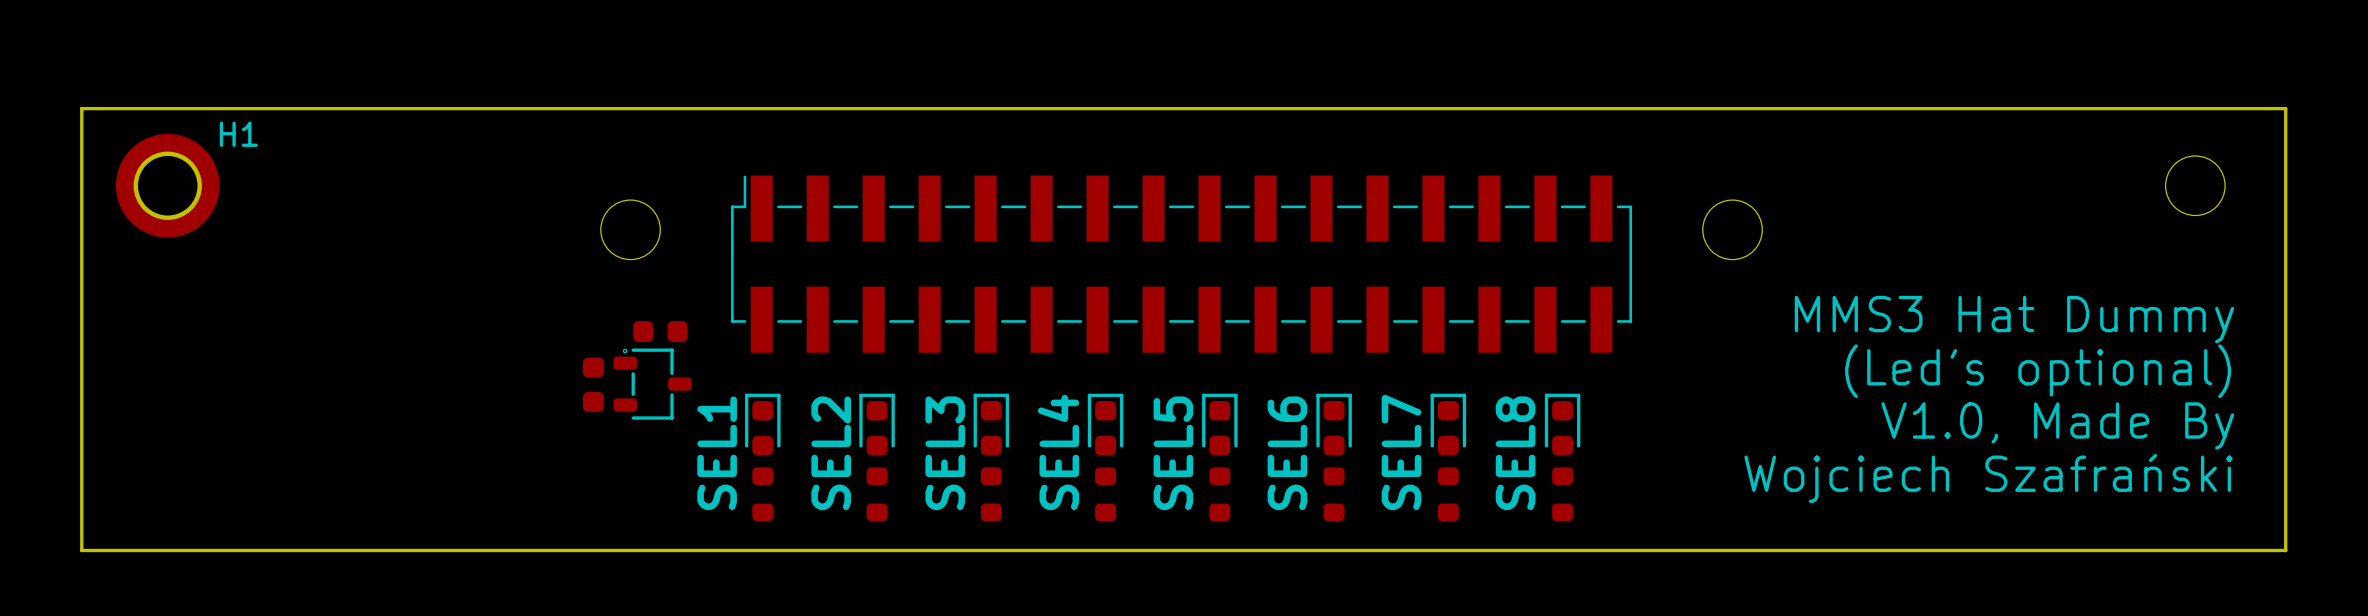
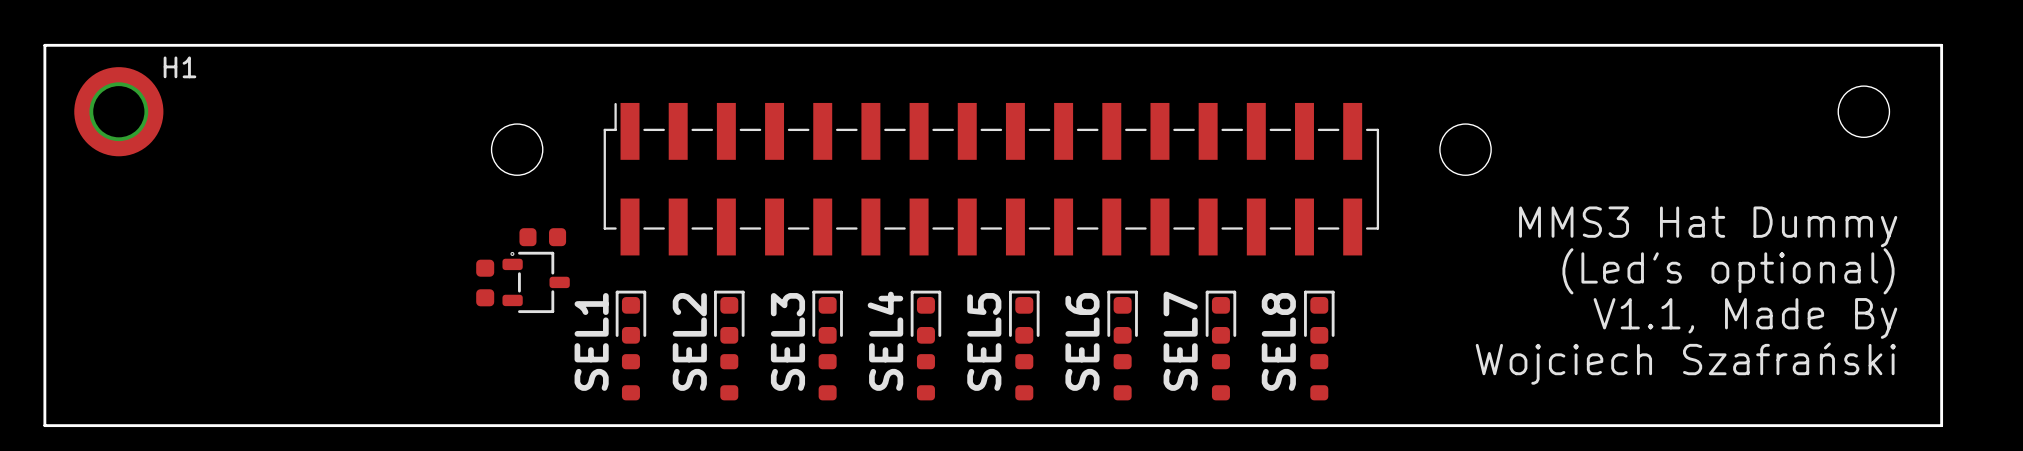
text: V1.0, Made By (2057, 426) -> V1.1, Made By (1745, 318)

